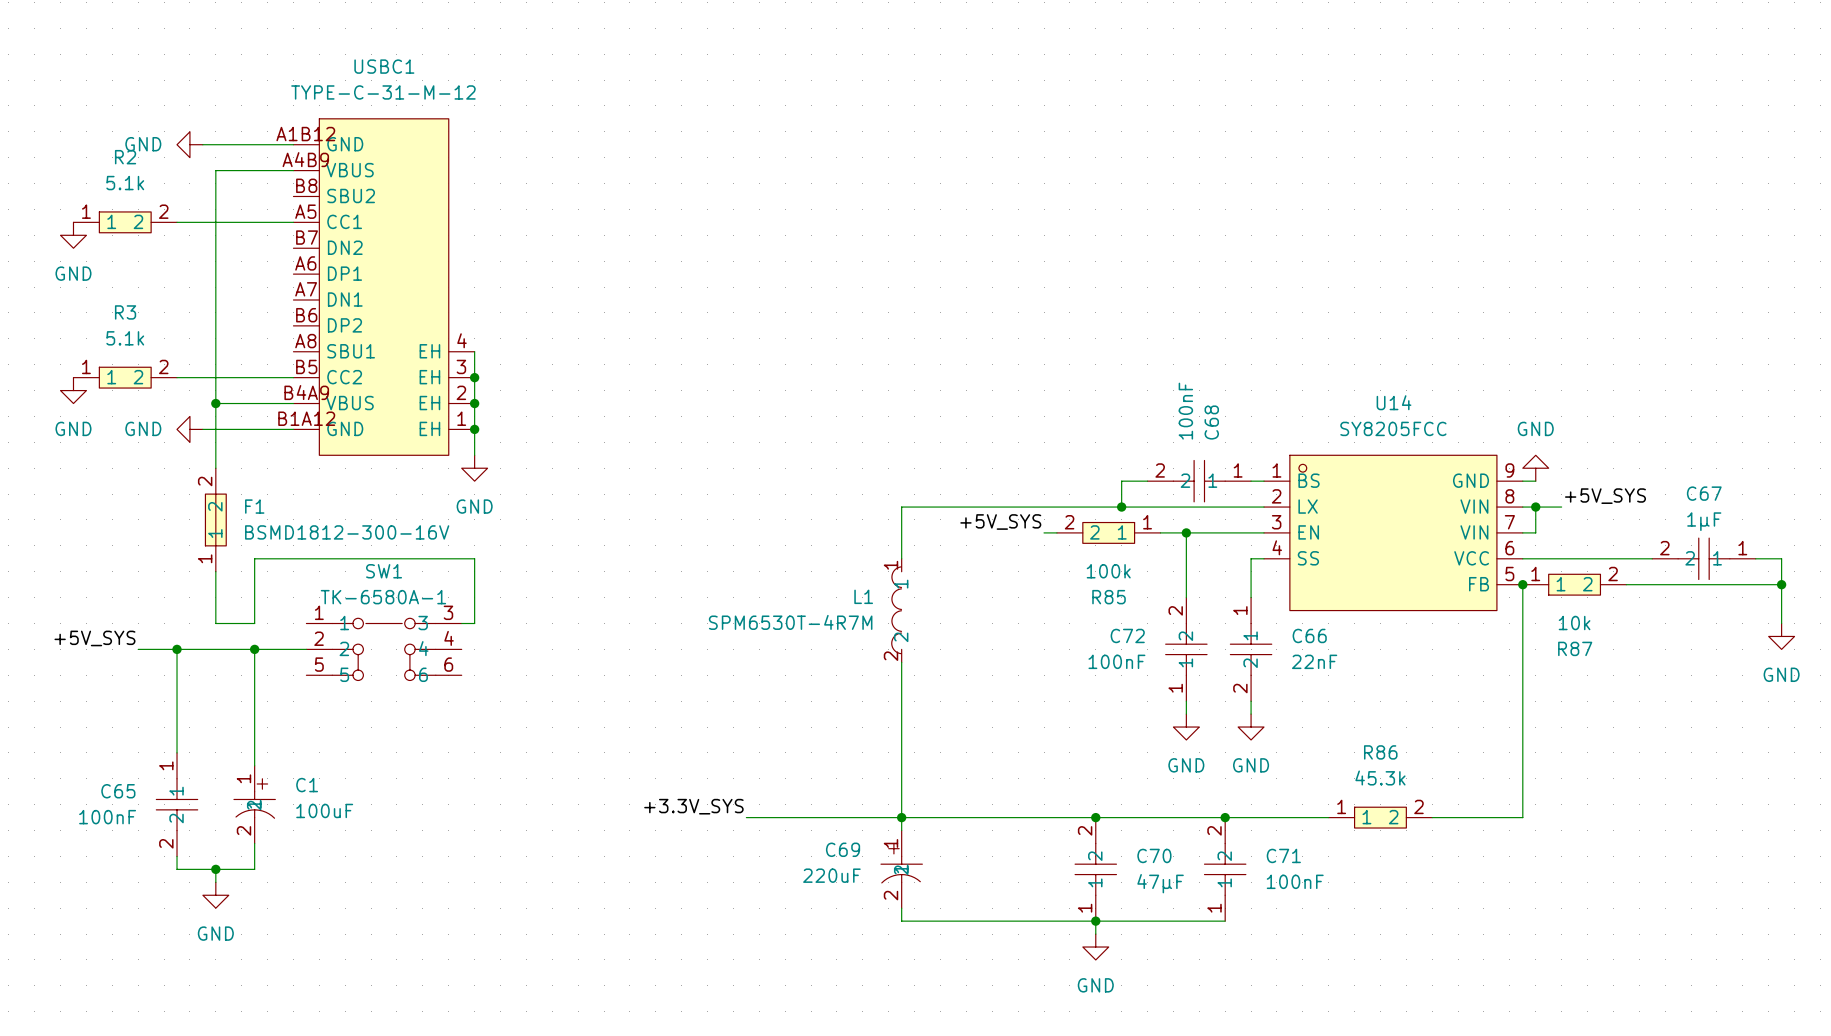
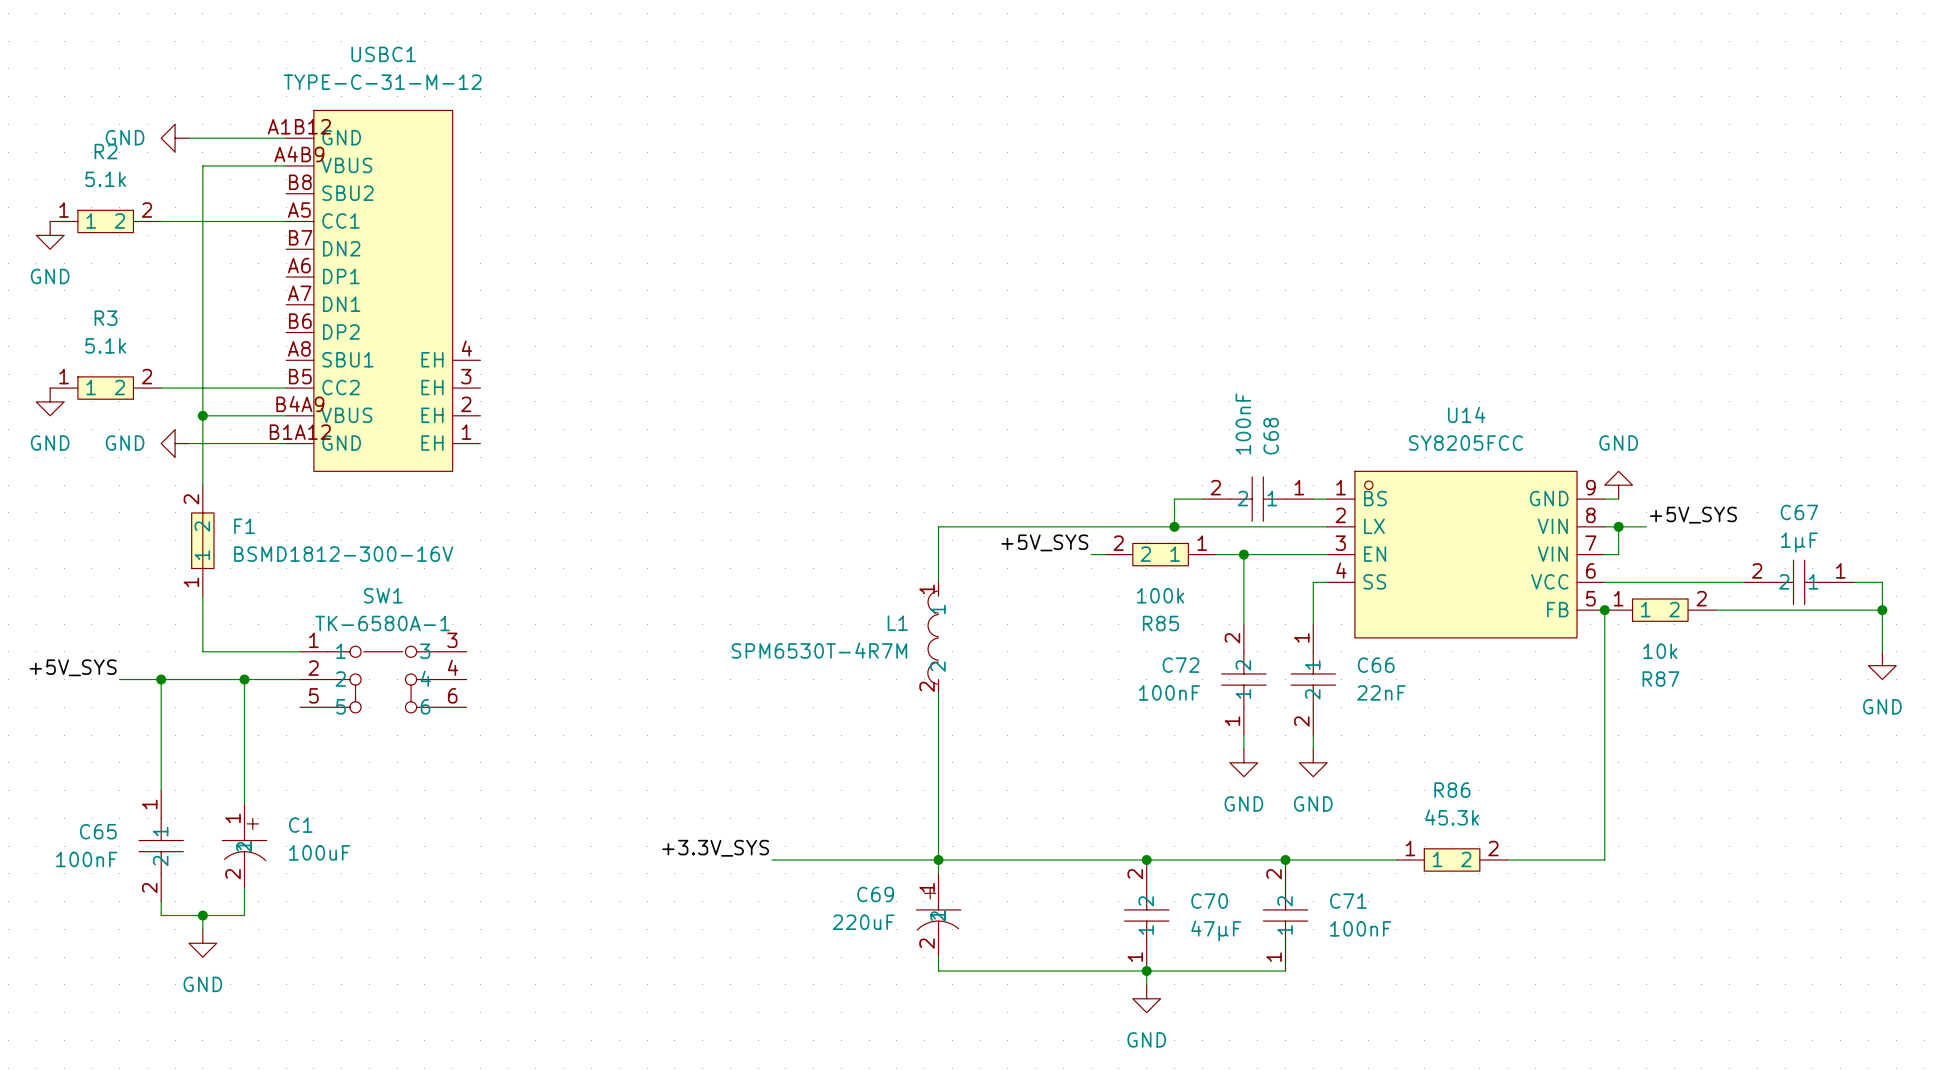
wire: (474, 351) (474, 455) -> none
junction: (474, 377) -> none
junction: (474, 403) -> none
junction: (474, 429) -> none
power symbol: GND (474, 468) -> none
wire: (254, 623) (254, 558) (474, 558) (474, 623) (461, 623) -> (244, 651) (299, 651)

